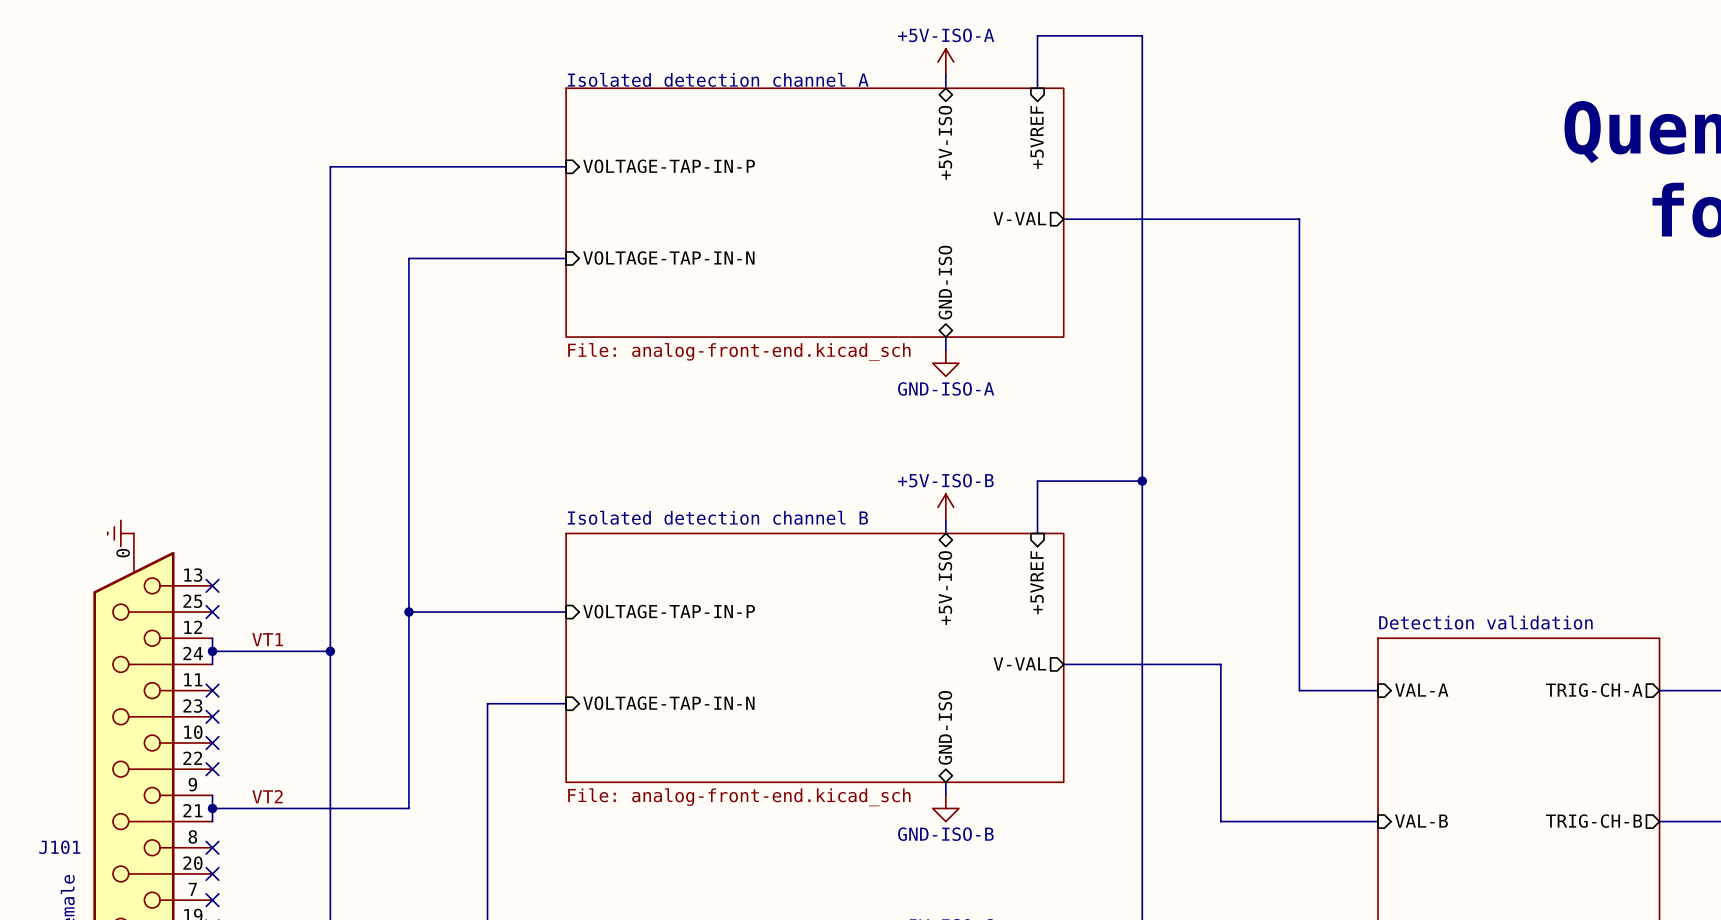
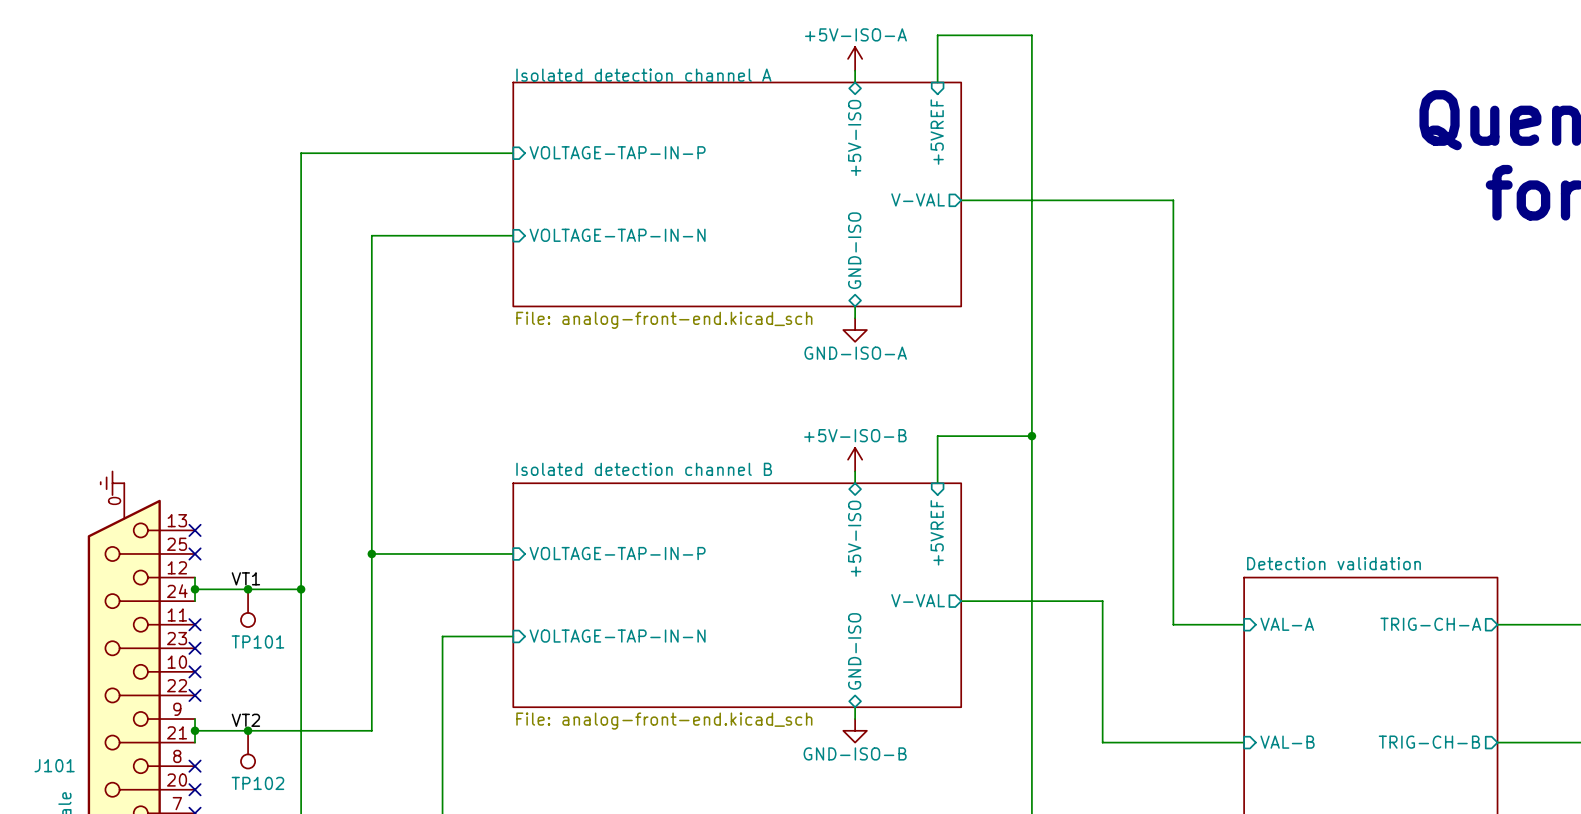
junction: none -> (248, 589)
TP101: none -> (248, 608)
junction: none -> (248, 730)
TP102: none -> (248, 749)

